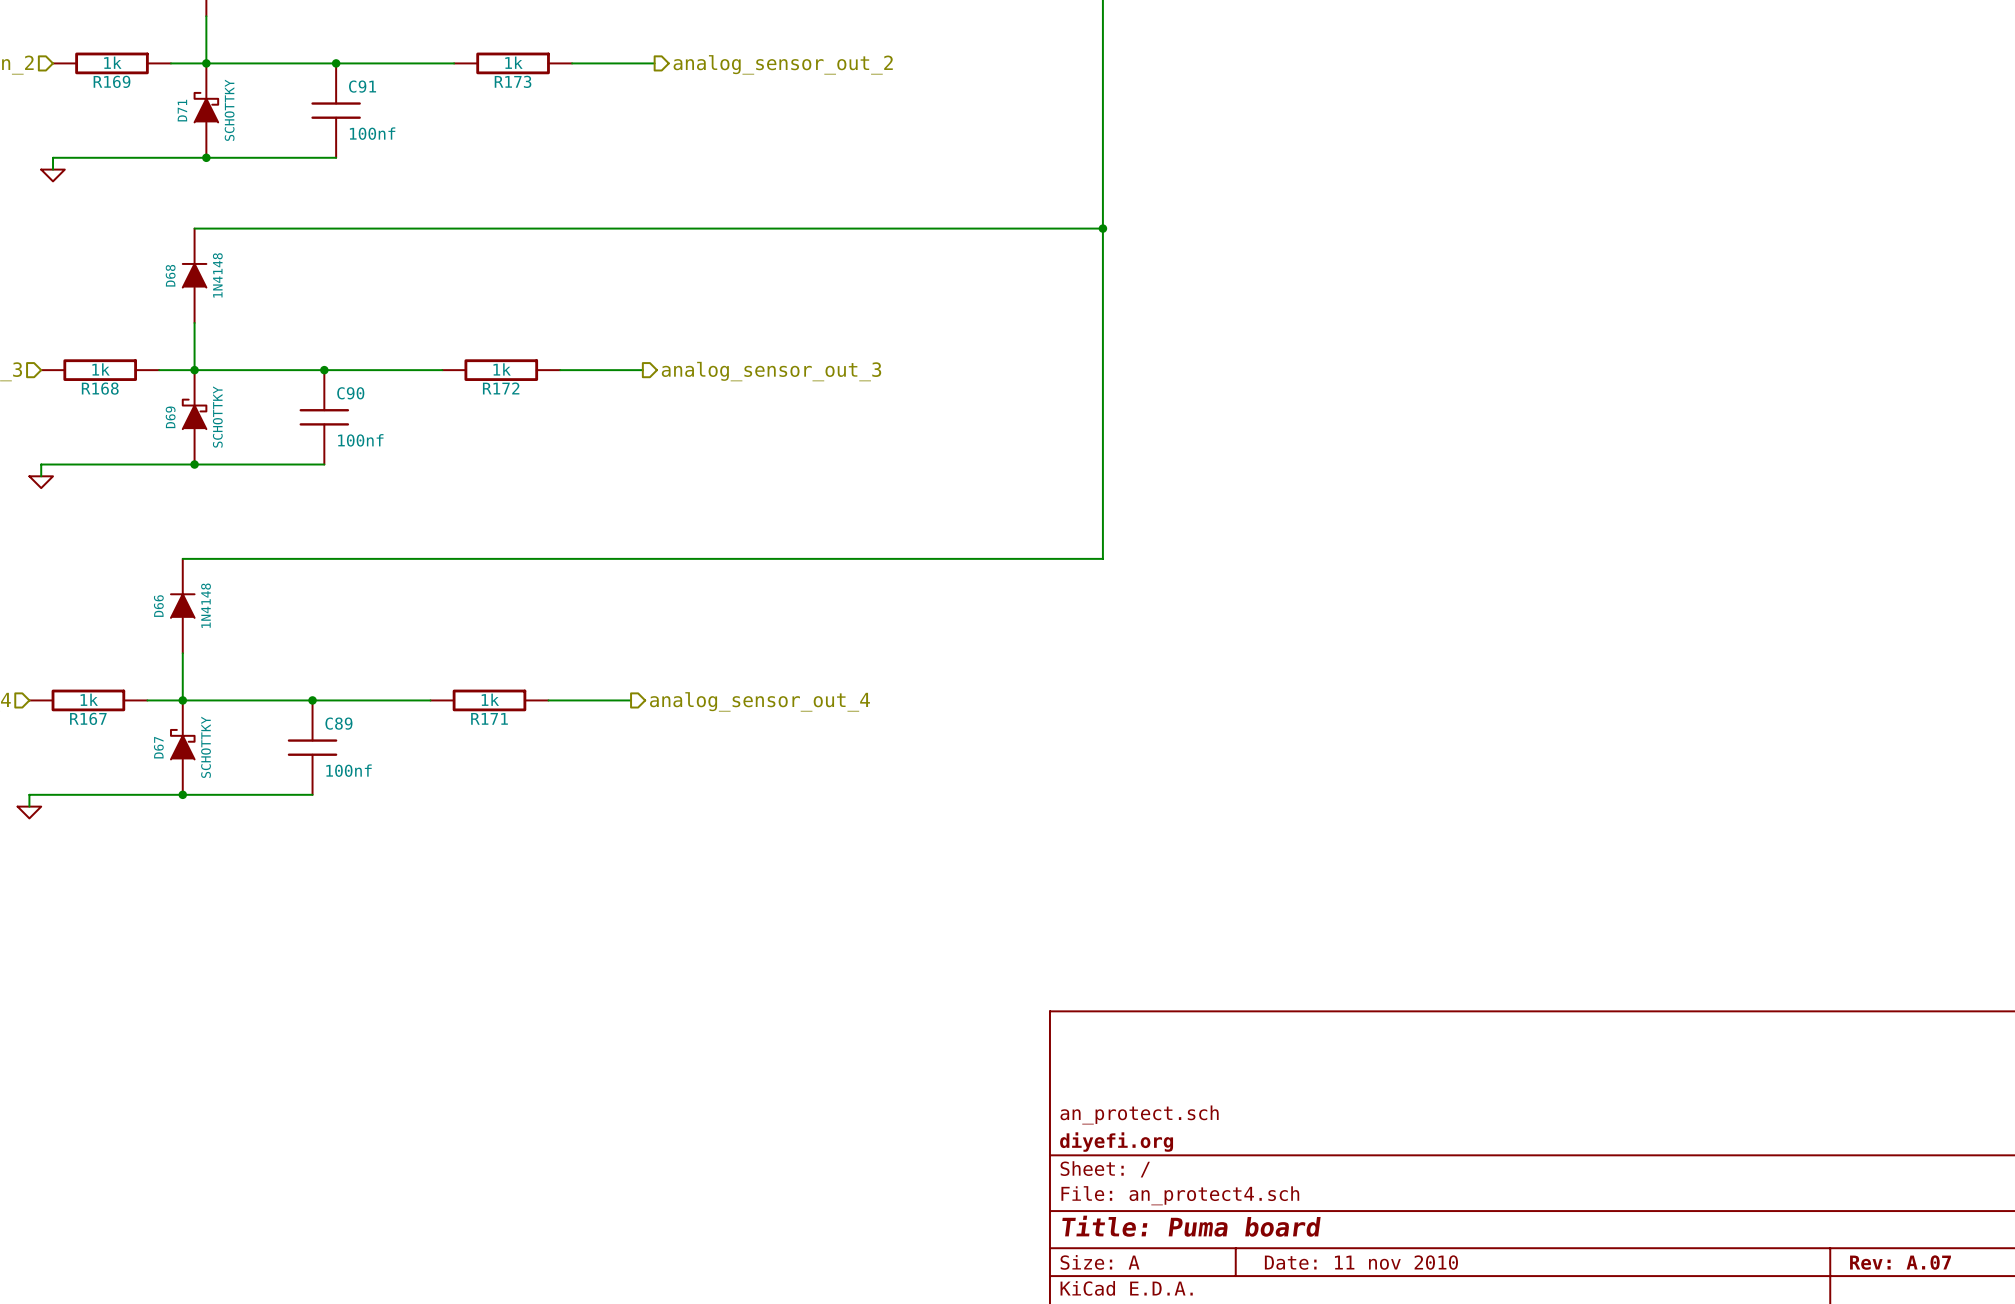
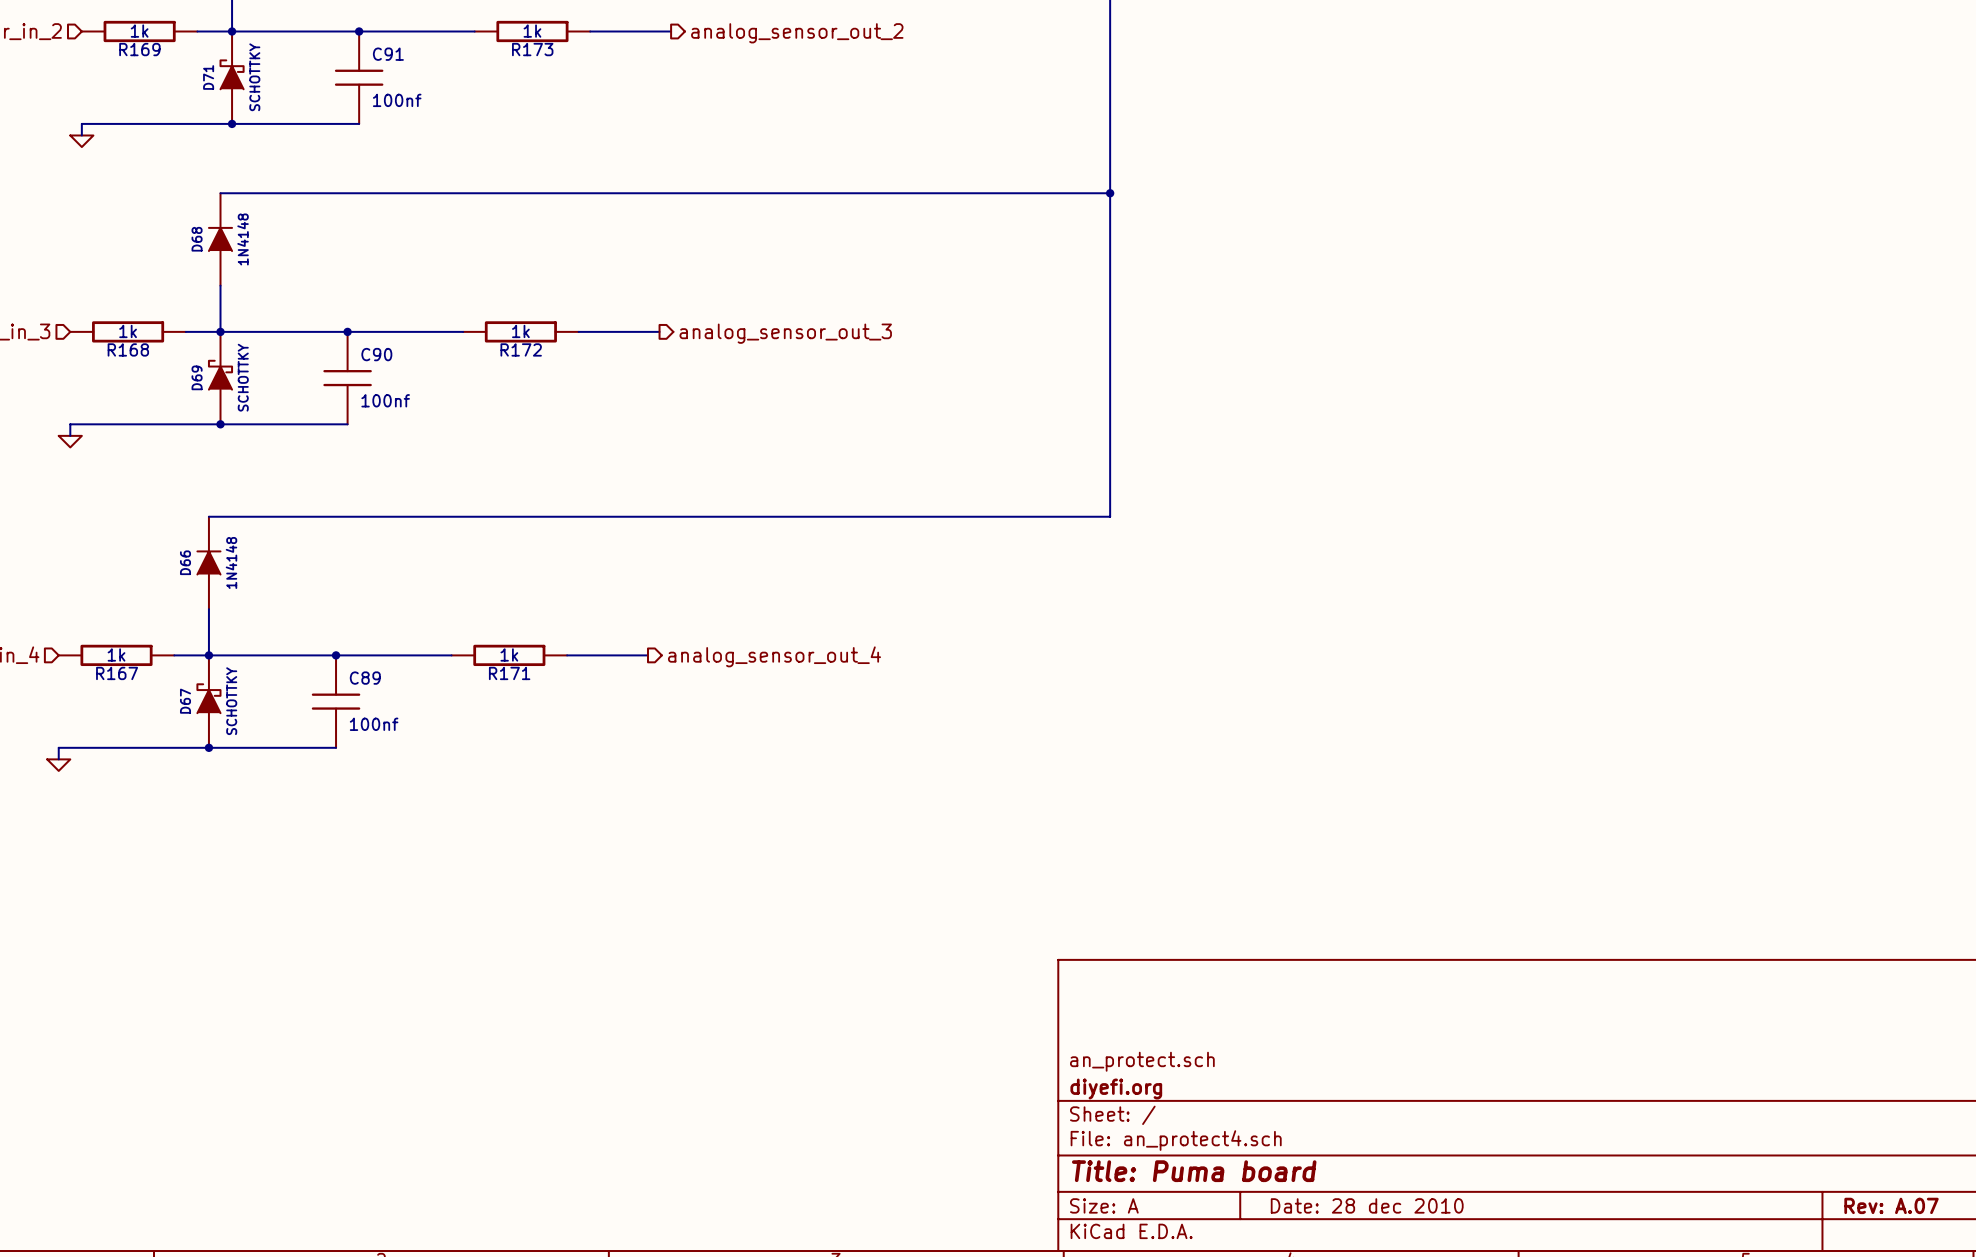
title block: Date: 11 nov 2010 (1361, 1262) -> Date: 28 dec 2010 (1367, 1205)

